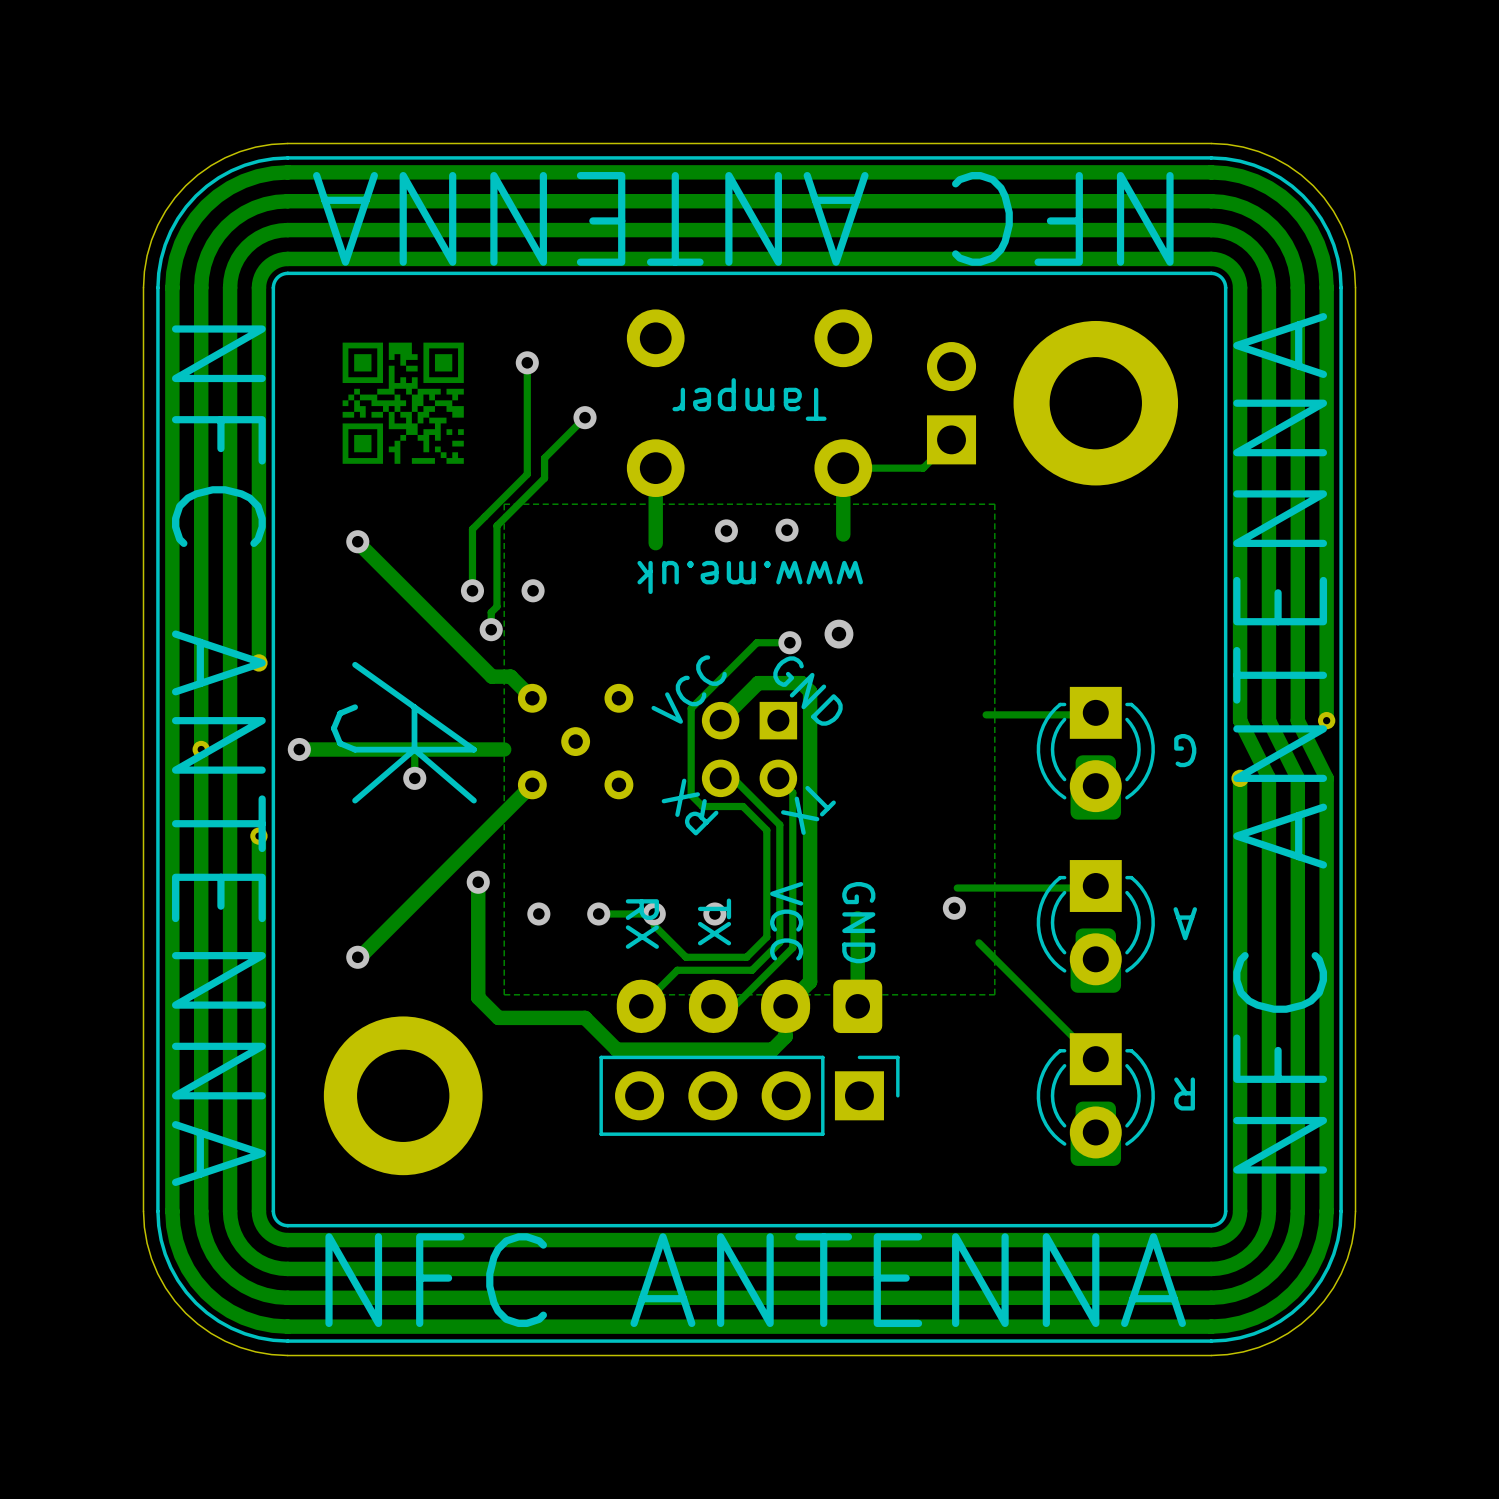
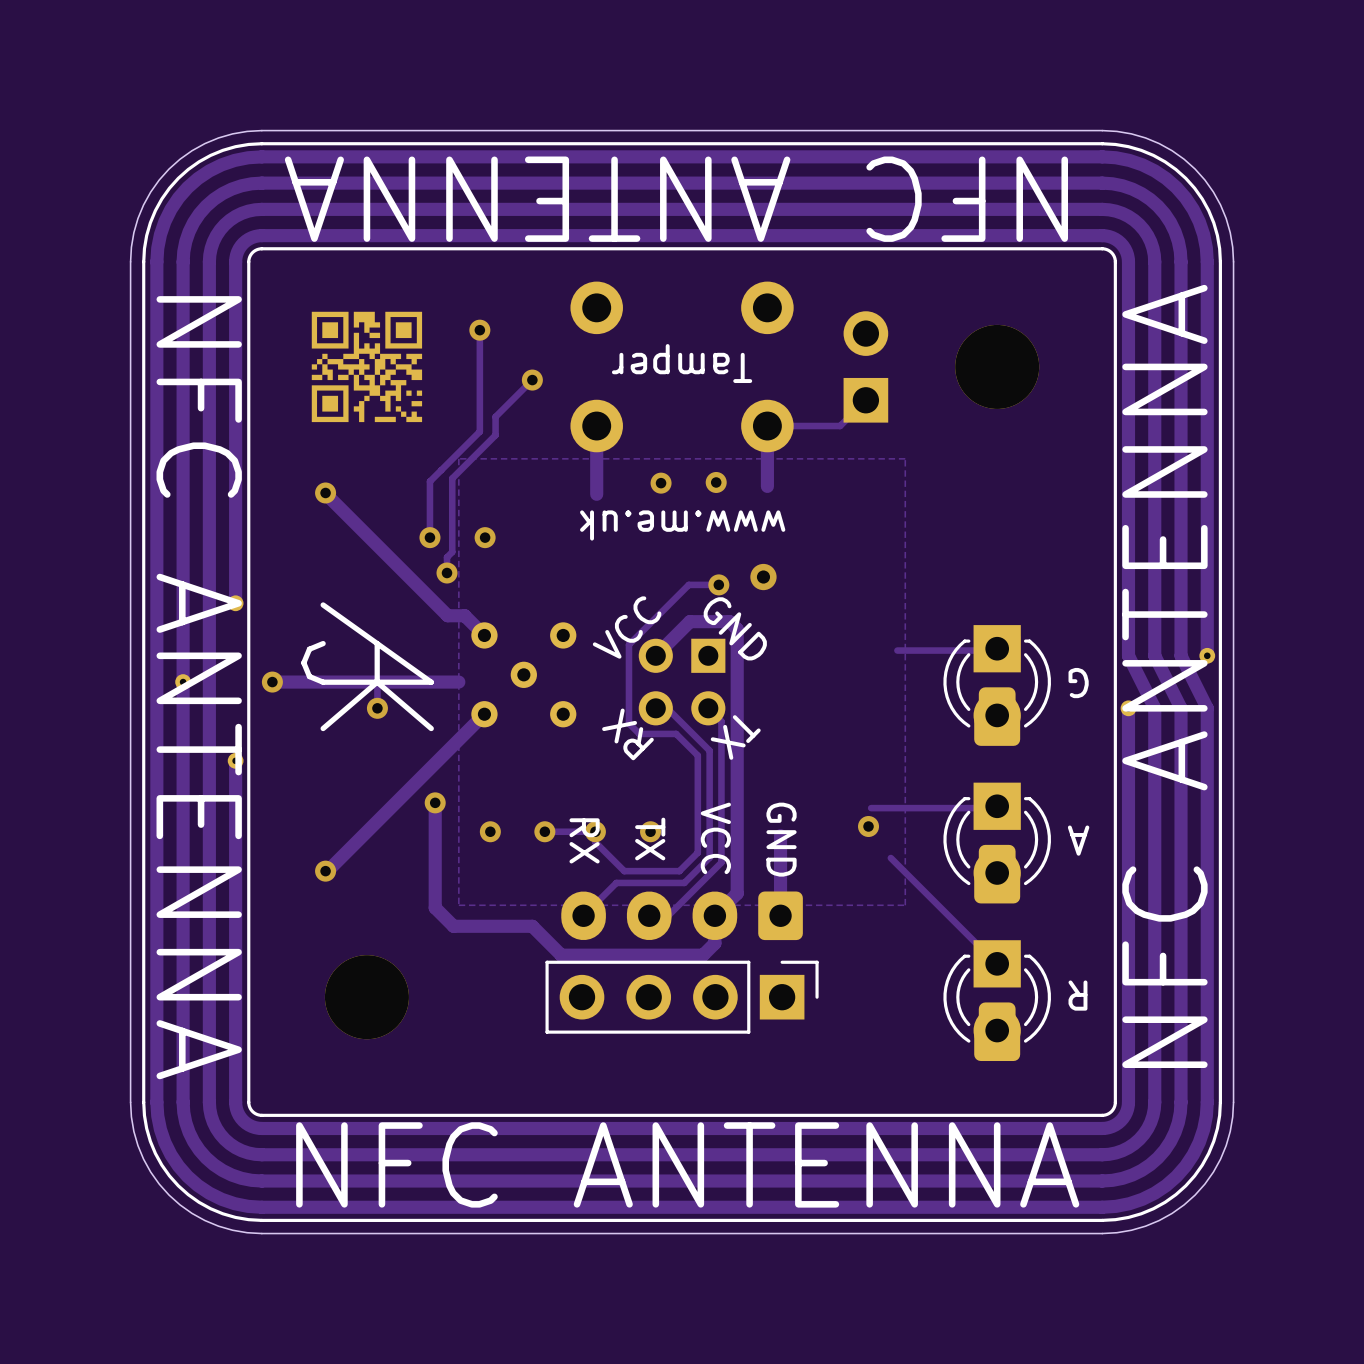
part footprint: [1013, 320, 1179, 486] -> [955, 324, 1040, 409]
part footprint: [323, 1016, 483, 1176] -> [324, 955, 409, 1040]

